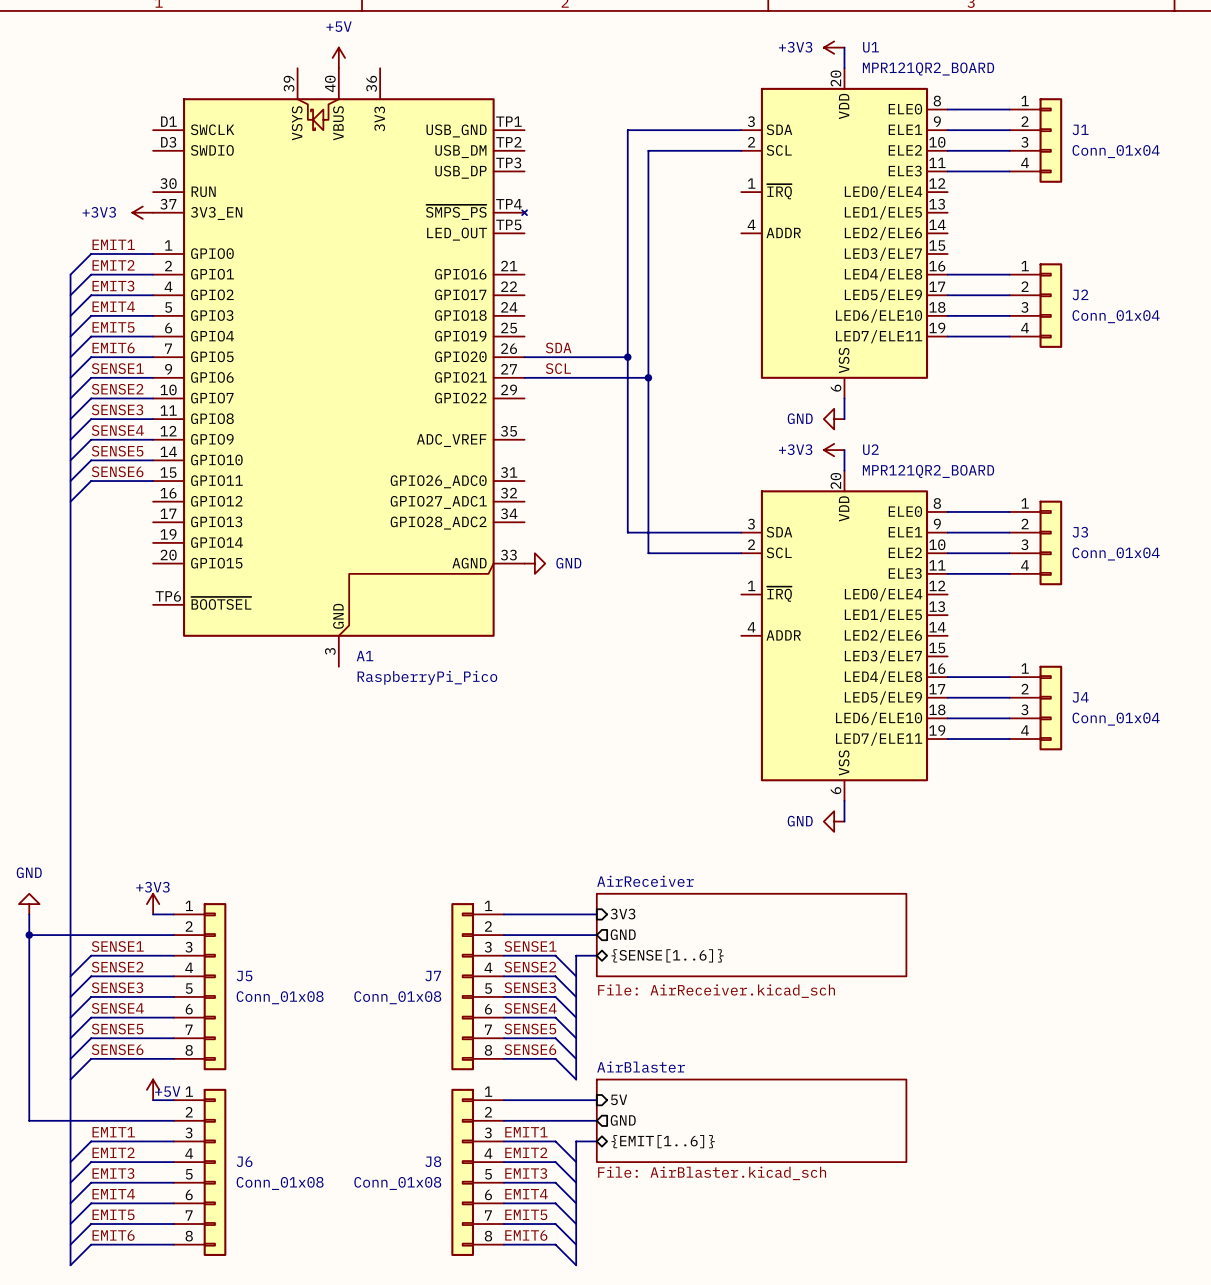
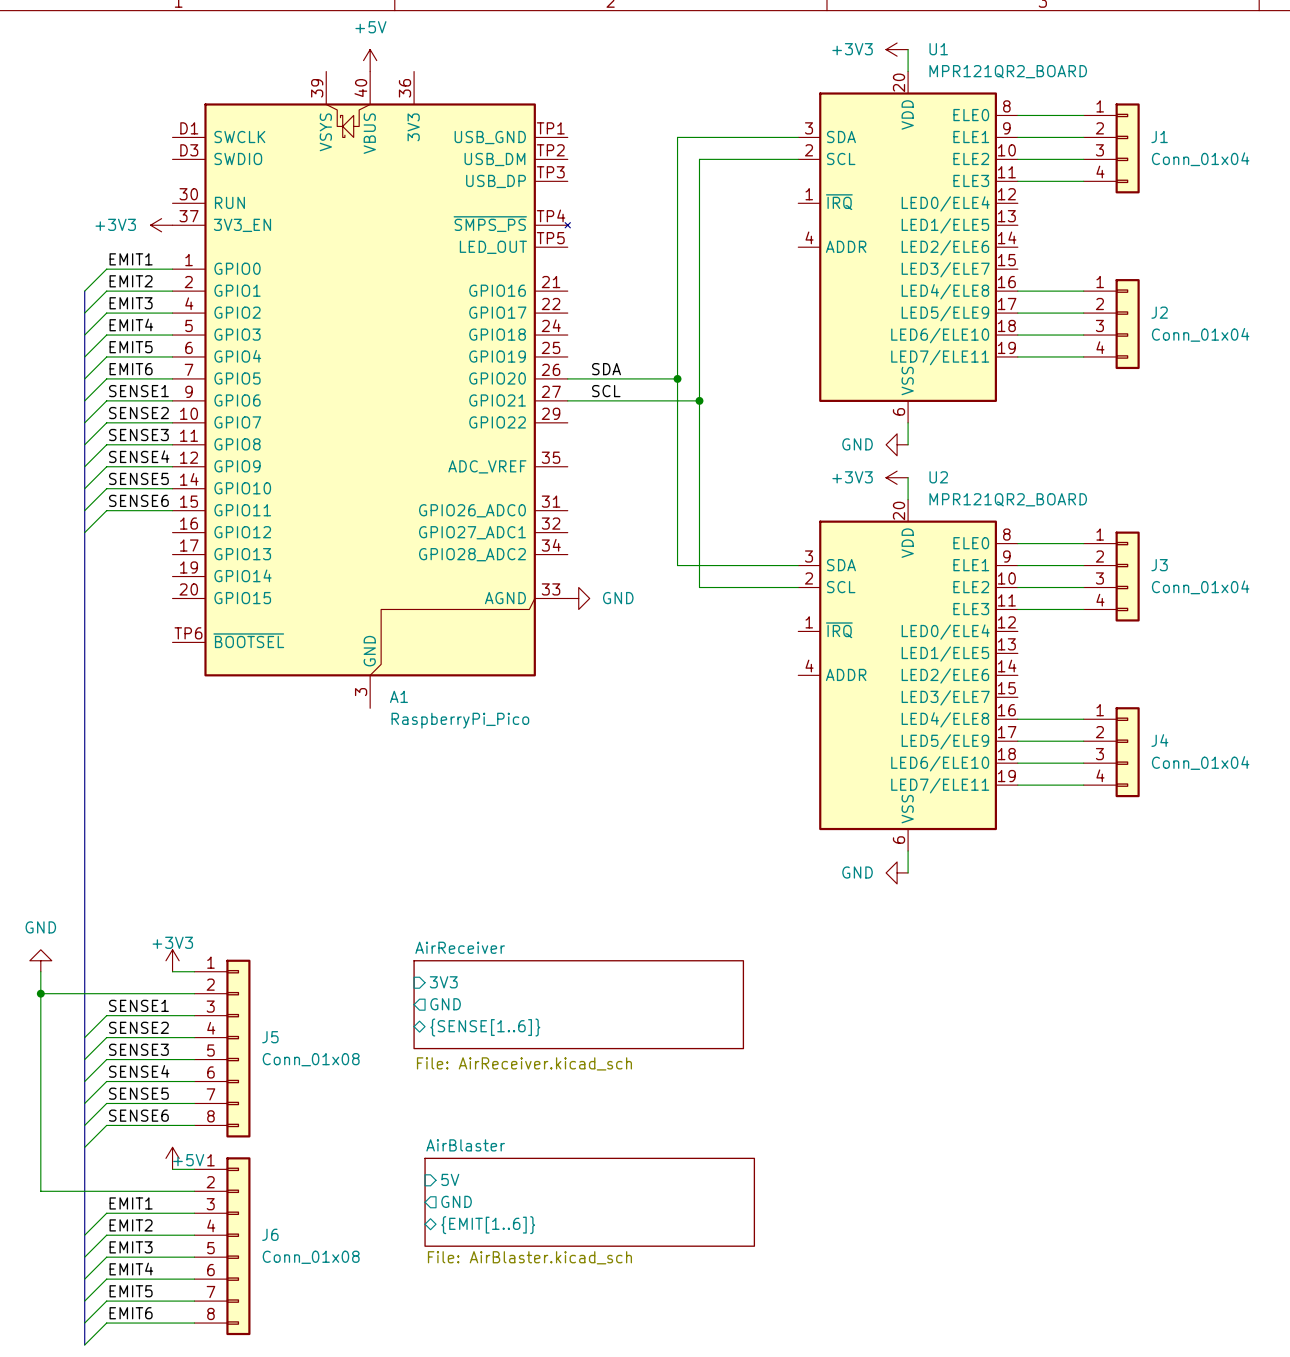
wire: (503, 914) (596, 914) -> none
sheet pin: 3V3 (622, 914) -> none
sheet pin: none -> 3V3 (443, 982)
sheet pin: GND (623, 934) -> none
wire: (503, 935) (596, 935) -> none
sheet AirReceiver: File: AirReceiver.kicad_sch (751, 935) -> none
sheet pin: none -> GND (445, 1004)
sheet AirReceiver: none -> File: AirReceiver.kicad_sch (578, 1004)
label: SENSE1 (530, 946) -> none
wire: (503, 955) (555, 955) (576, 976) -> none
bus: (596, 955) (576, 955) (576, 1079) -> none
sheet pin: {SENSE[1..6]} (667, 955) -> none
sheet pin: none -> {SENSE[1..6]} (485, 1027)
label: SENSE2 (530, 967) -> none
wire: (503, 976) (555, 976) (576, 996) -> none
J7: Conn_01x08 (477, 986) -> none
label: SENSE3 (530, 987) -> none
wire: (503, 996) (555, 996) (576, 1017) -> none
label: SENSE4 (530, 1008) -> none
wire: (503, 1017) (555, 1017) (576, 1038) -> none
label: SENSE5 (530, 1029) -> none
wire: (503, 1038) (555, 1038) (576, 1058) -> none
label: SENSE6 (530, 1049) -> none
wire: (503, 1058) (555, 1058) (576, 1079) -> none
sheet pin: 5V (619, 1099) -> none
wire: (503, 1100) (596, 1100) -> none
sheet pin: none -> 5V (450, 1179)
wire: (503, 1120) (596, 1120) -> none
sheet pin: GND (623, 1120) -> none
sheet AirBlaster: File: AirBlaster.kicad_sch (751, 1120) -> none
sheet pin: none -> GND (456, 1201)
sheet AirBlaster: none -> File: AirBlaster.kicad_sch (589, 1202)
label: EMIT1 (526, 1132) -> none
wire: (503, 1141) (555, 1141) (576, 1162) -> none
bus: (596, 1141) (576, 1141) (576, 1265) -> none
sheet pin: {EMIT[1..6]} (663, 1141) -> none
sheet pin: none -> {EMIT[1..6]} (488, 1225)
label: EMIT2 (526, 1152) -> none
wire: (503, 1162) (555, 1162) (576, 1182) -> none
J8: Conn_01x08 (477, 1172) -> none
label: EMIT3 (526, 1173) -> none
wire: (503, 1182) (555, 1182) (576, 1203) -> none
label: EMIT4 (526, 1194) -> none
wire: (503, 1203) (555, 1203) (576, 1224) -> none
label: EMIT5 (526, 1214) -> none
wire: (503, 1224) (555, 1224) (576, 1244) -> none
label: EMIT6 (526, 1235) -> none
wire: (503, 1244) (555, 1244) (576, 1265) -> none

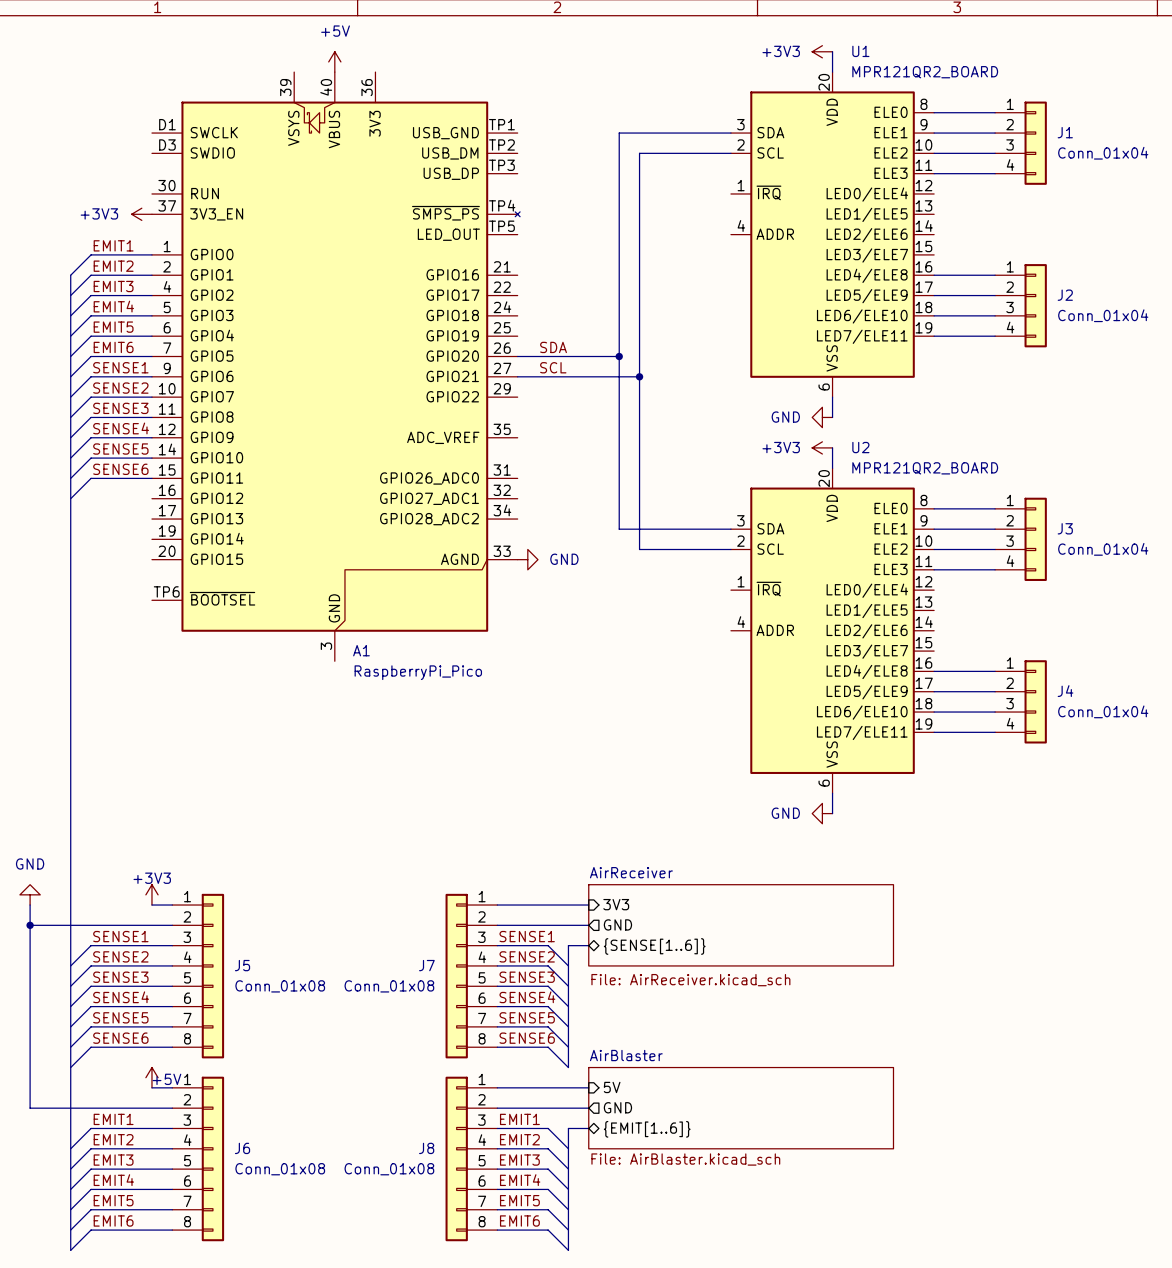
wire: none -> (497, 905) (588, 905)
sheet pin: none -> 3V3 (616, 904)
sheet pin: 3V3 (443, 982) -> none
wire: none -> (497, 925) (588, 925)
sheet pin: none -> GND (617, 924)
sheet AirReceiver: none -> File: AirReceiver.kicad_sch (741, 925)
sheet pin: GND (445, 1004) -> none
sheet AirReceiver: File: AirReceiver.kicad_sch (578, 1004) -> none
label: none -> SENSE1 (527, 936)
wire: none -> (497, 945) (548, 945) (568, 965)
bus: none -> (588, 945) (568, 945) (568, 1067)
sheet pin: none -> {SENSE[1..6]} (654, 946)
sheet pin: {SENSE[1..6]} (485, 1027) -> none
label: none -> SENSE2 (527, 956)
wire: none -> (497, 965) (548, 965) (568, 986)
J7: none -> Conn_01x08 (471, 976)
label: none -> SENSE3 (527, 977)
wire: none -> (497, 986) (548, 986) (568, 1006)
label: none -> SENSE4 (527, 997)
wire: none -> (497, 1006) (548, 1006) (568, 1026)
label: none -> SENSE5 (527, 1017)
wire: none -> (497, 1026) (548, 1026) (568, 1047)
label: none -> SENSE6 (527, 1038)
wire: none -> (497, 1047) (548, 1047) (568, 1067)
sheet pin: none -> 5V (612, 1087)
wire: none -> (497, 1087) (588, 1087)
sheet pin: 5V (450, 1179) -> none
sheet pin: none -> GND (617, 1107)
wire: none -> (497, 1108) (588, 1108)
sheet AirBlaster: none -> File: AirBlaster.kicad_sch (741, 1108)
sheet pin: GND (456, 1201) -> none
sheet AirBlaster: File: AirBlaster.kicad_sch (589, 1202) -> none
label: none -> EMIT1 (519, 1119)
wire: none -> (497, 1128) (548, 1128) (568, 1148)
bus: none -> (588, 1128) (568, 1128) (568, 1250)
sheet pin: none -> {EMIT[1..6]} (647, 1129)
sheet pin: {EMIT[1..6]} (488, 1225) -> none
label: none -> EMIT2 (519, 1139)
wire: none -> (497, 1148) (548, 1148) (568, 1169)
J8: none -> Conn_01x08 (471, 1158)
label: none -> EMIT3 (519, 1160)
wire: none -> (497, 1169) (548, 1169) (568, 1189)
label: none -> EMIT4 (520, 1180)
wire: none -> (497, 1189) (548, 1189) (568, 1209)
label: none -> EMIT5 (519, 1200)
wire: none -> (497, 1209) (548, 1209) (568, 1230)
label: none -> EMIT6 (519, 1220)
wire: none -> (497, 1230) (548, 1230) (568, 1250)

